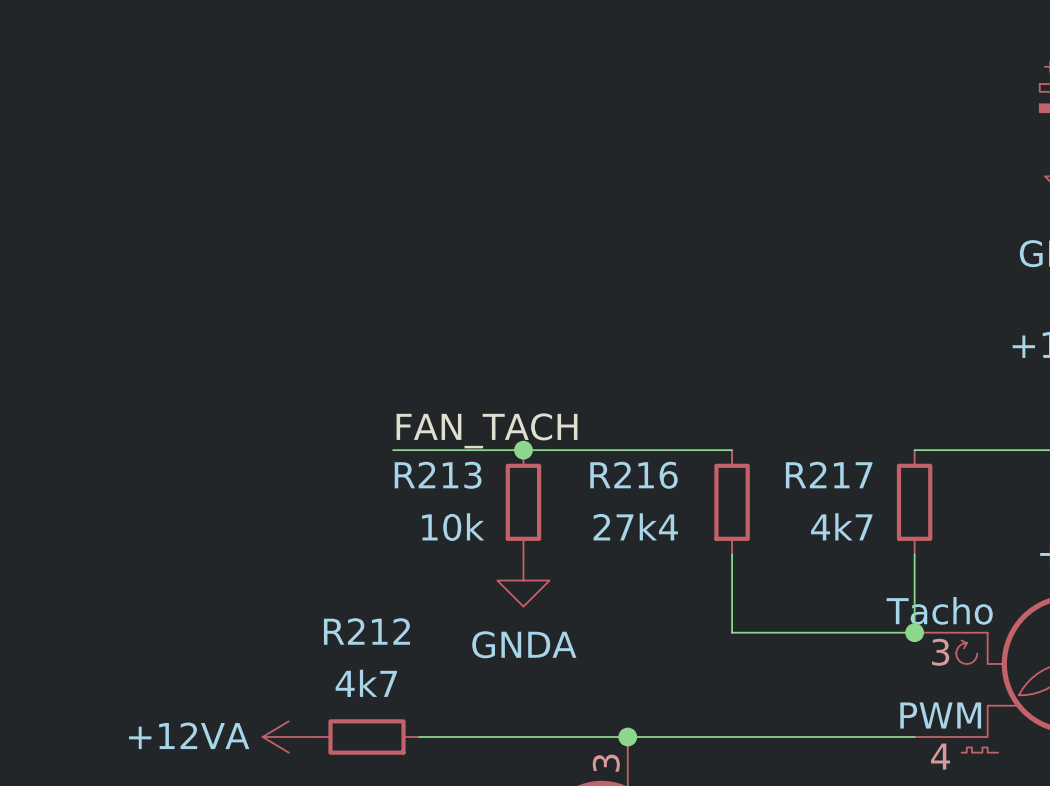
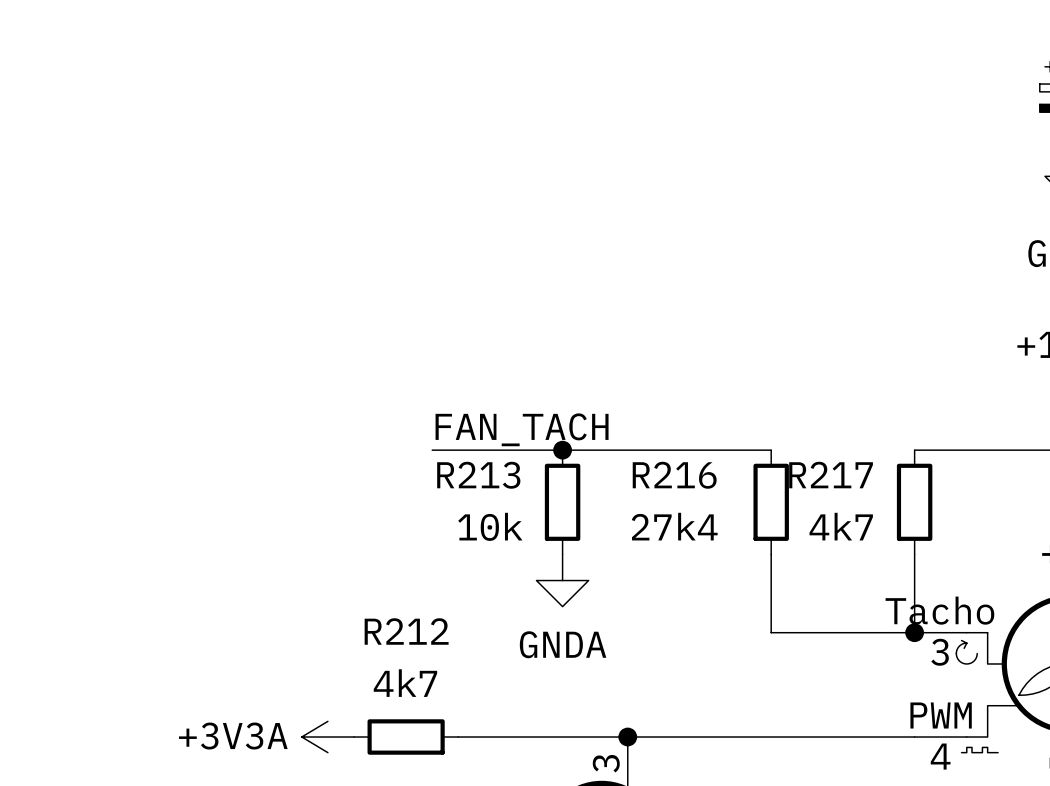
label position: FAN_TACH (487, 430) -> FAN_TACH (522, 429)
wire: (393, 450) (432, 450) -> (732, 450) (771, 450)
junction position: (523, 450) -> (562, 450)
R213 position: (523, 502) -> (562, 502)
R216 position: (732, 502) -> (771, 502)
wire: (732, 554) (732, 632) (771, 632) -> (771, 554) (771, 632)
power symbol position: GNDA (523, 580) -> GNDA (562, 580)
power symbol: +12VA (288, 737) -> none
power symbol: none -> +3V3A (327, 737)
R212 position: (367, 737) -> (406, 737)
wire: (419, 737) (458, 737) -> none

